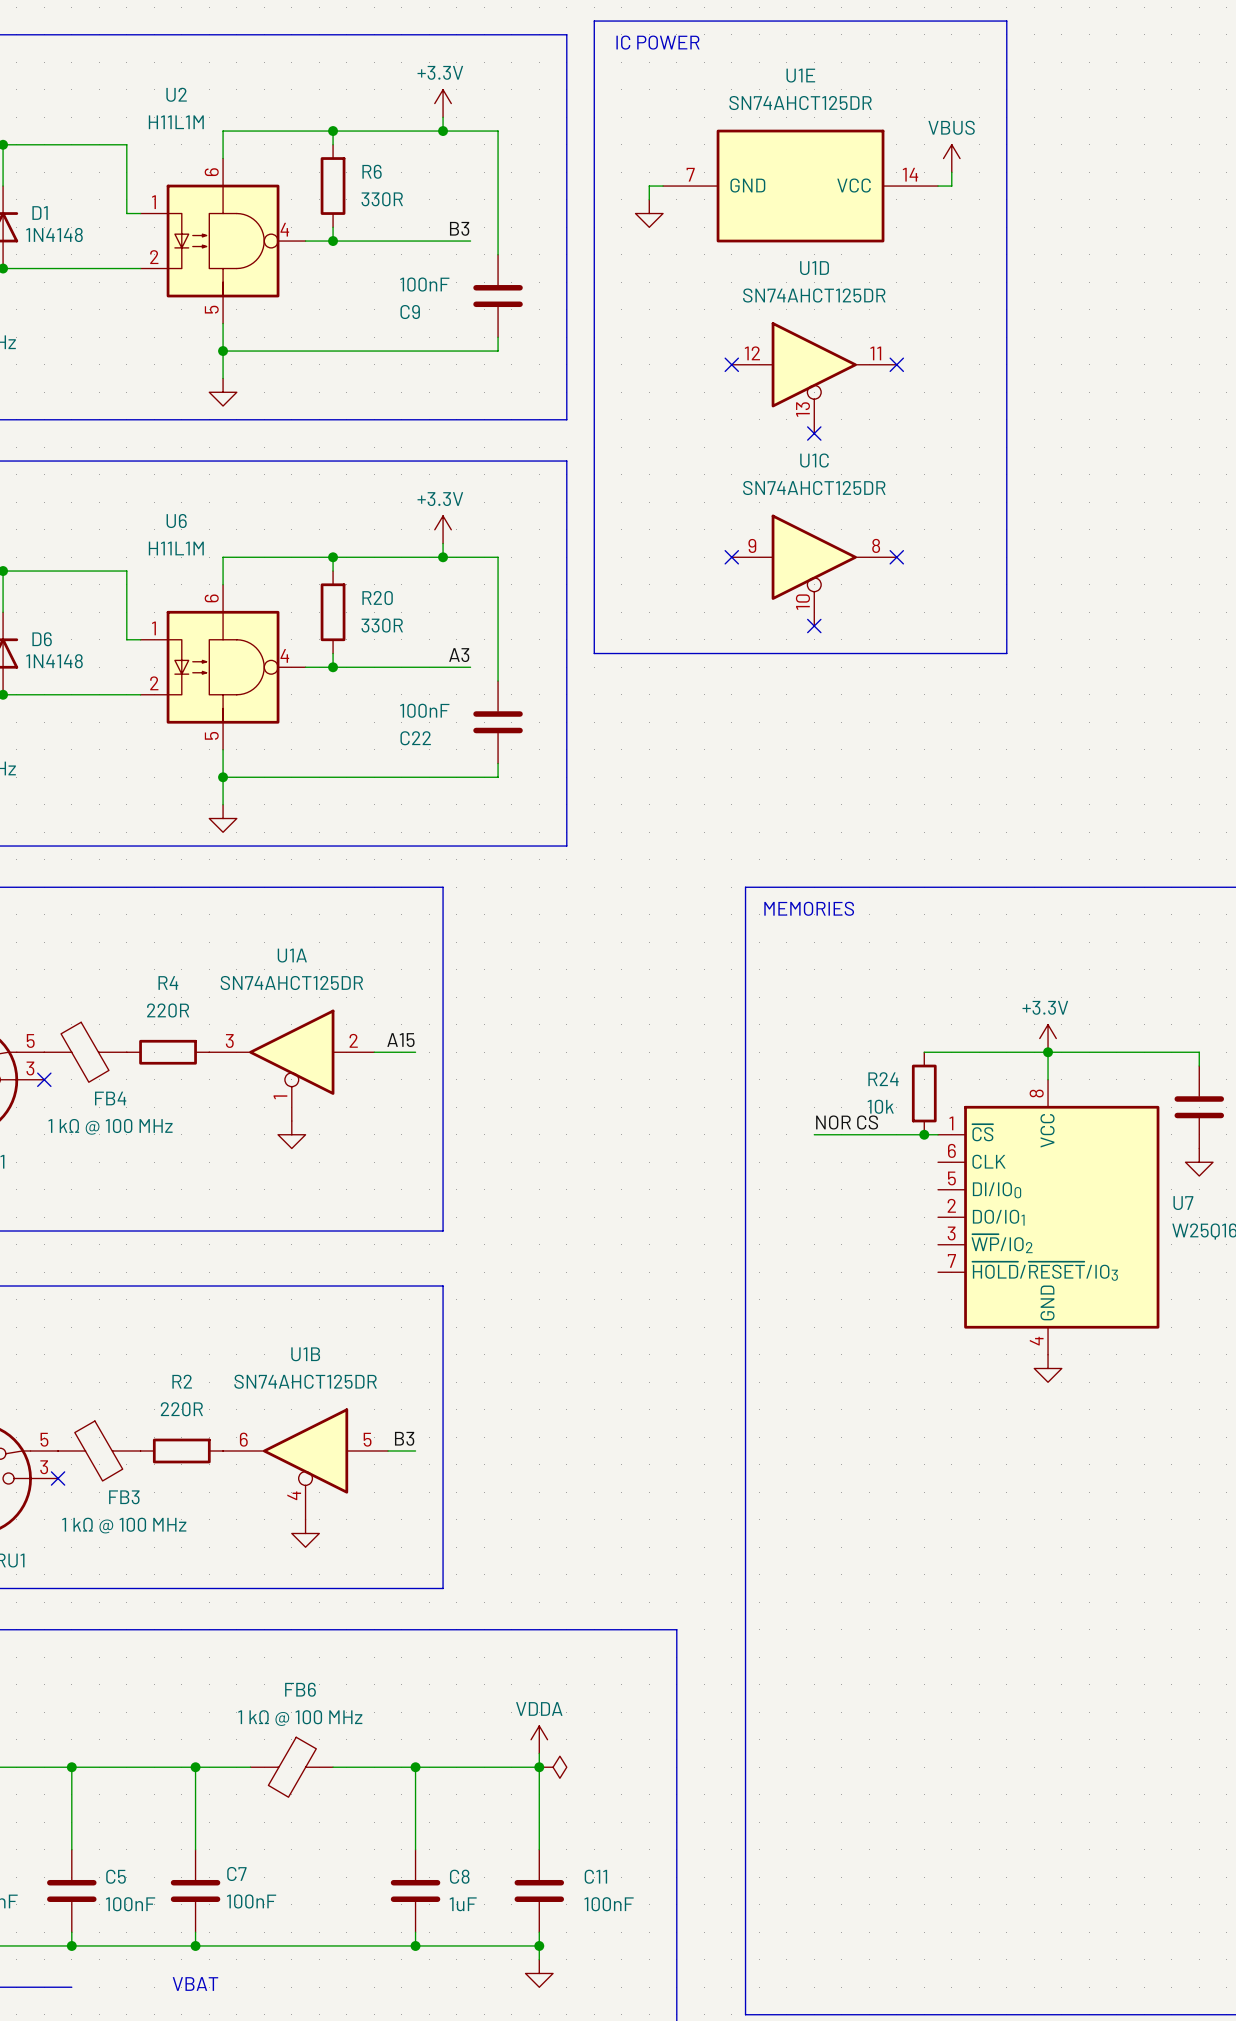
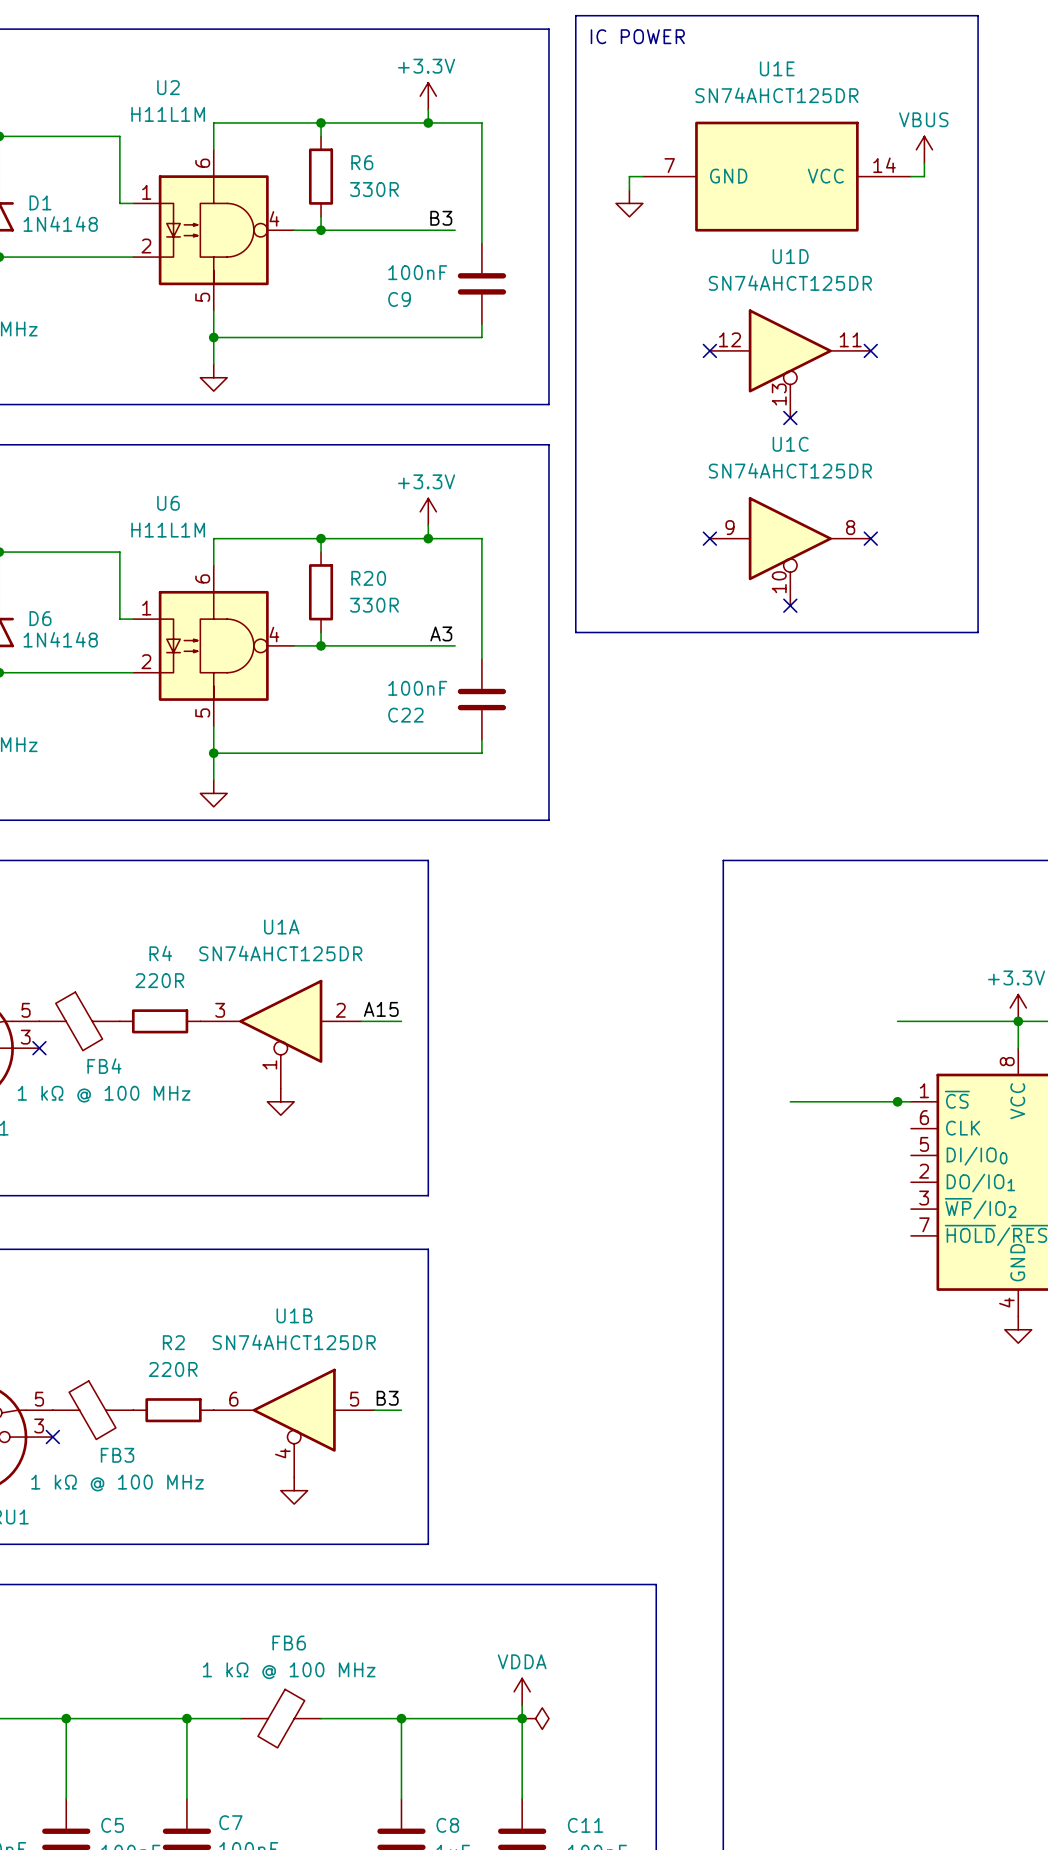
text: MEMORIES (809, 908) -> none
R24: 10k (924, 1093) -> none
label: NOR CS (847, 1122) -> none

